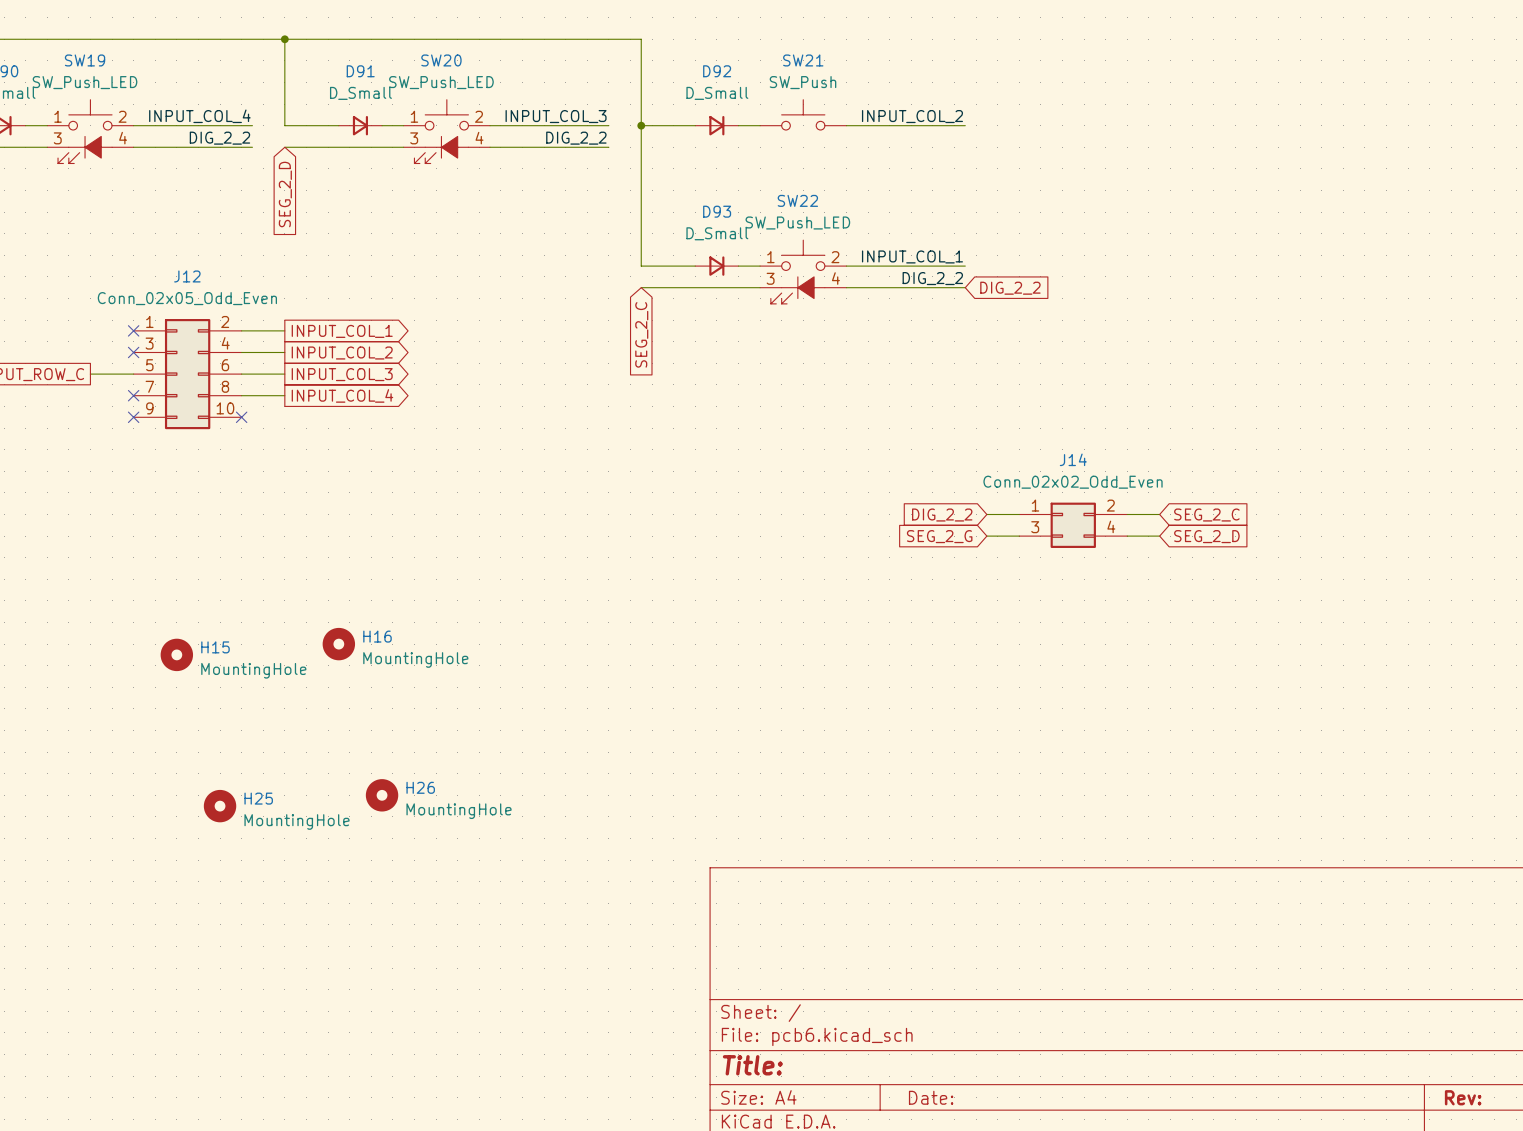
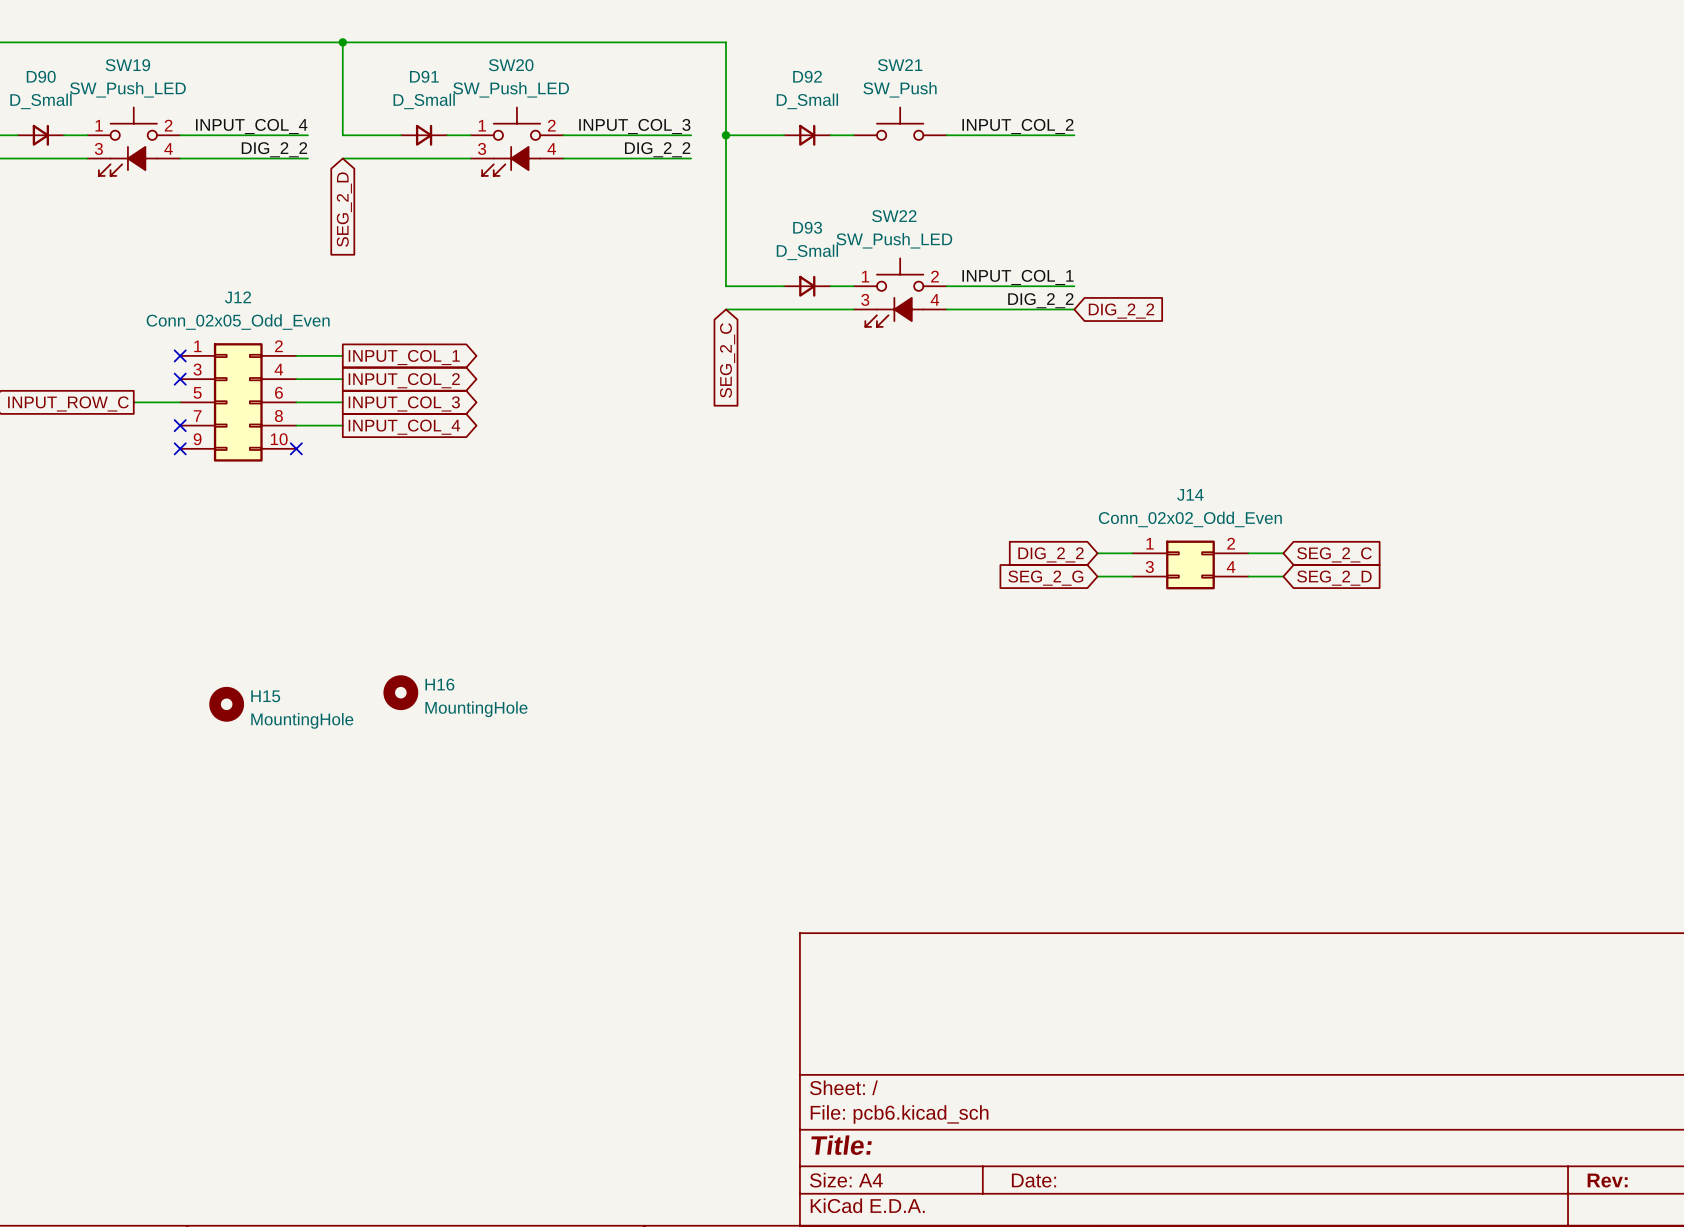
H26: MountingHole (382, 795) -> none
H25: MountingHole (220, 806) -> none

